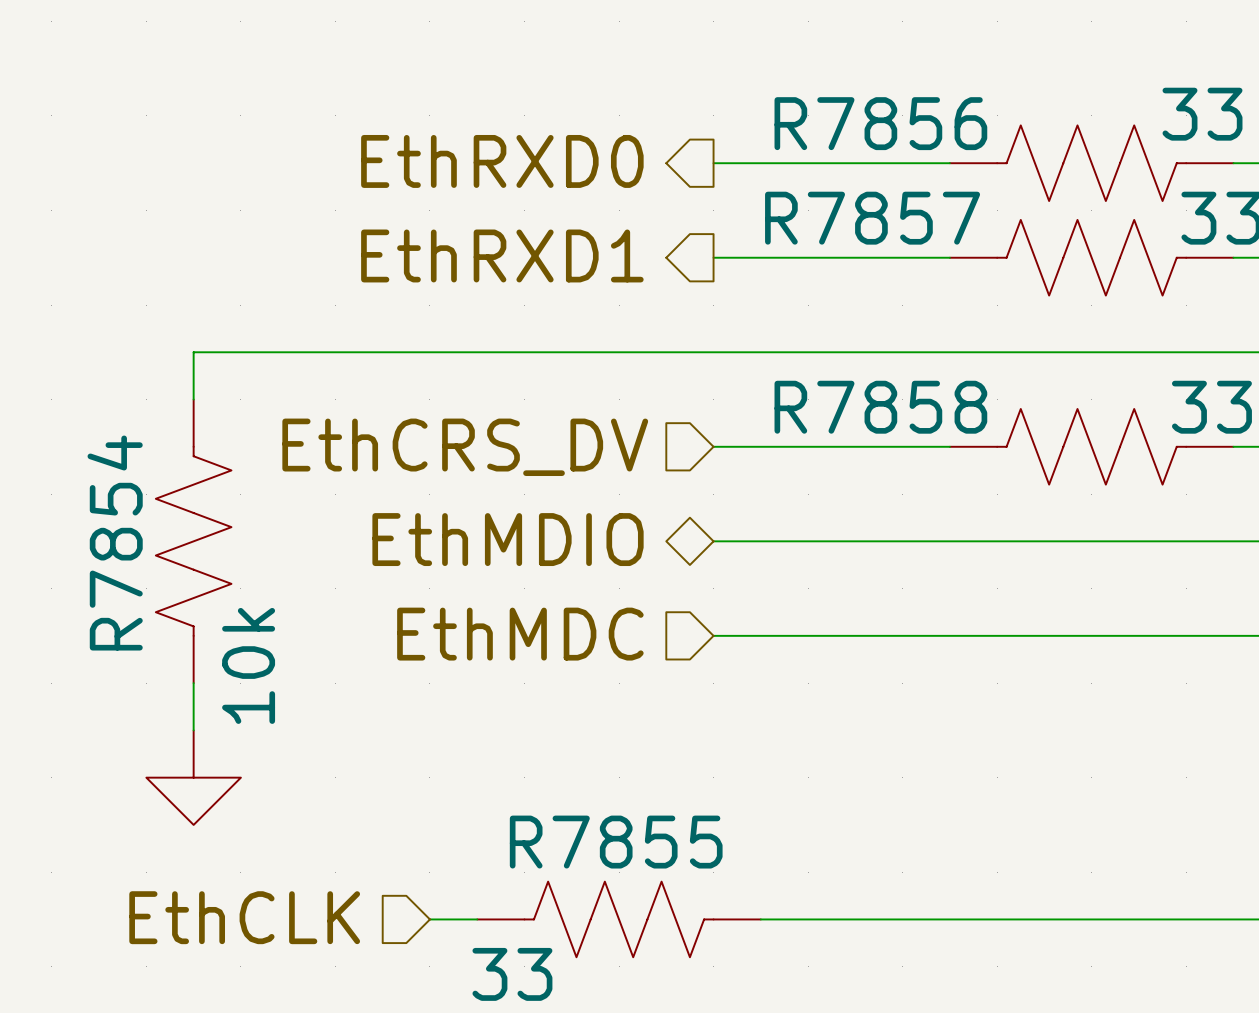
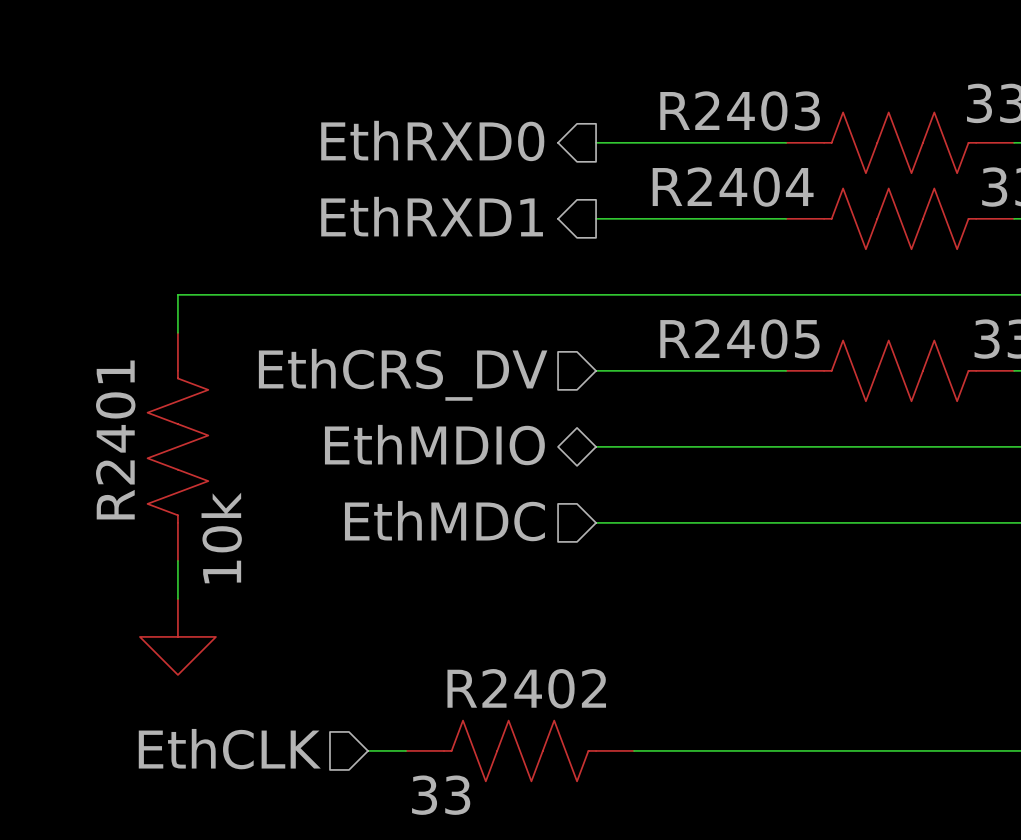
R7856 name: R7856 (880, 123) -> R2403 (740, 111)
R7857 name: R7857 (872, 218) -> R2404 (733, 187)
R7858 name: R7858 (880, 407) -> R2405 (739, 339)
R7854 name: R7854 (115, 543) -> R2401 (115, 439)
R7855 name: R7855 (616, 842) -> R2402 (526, 688)

